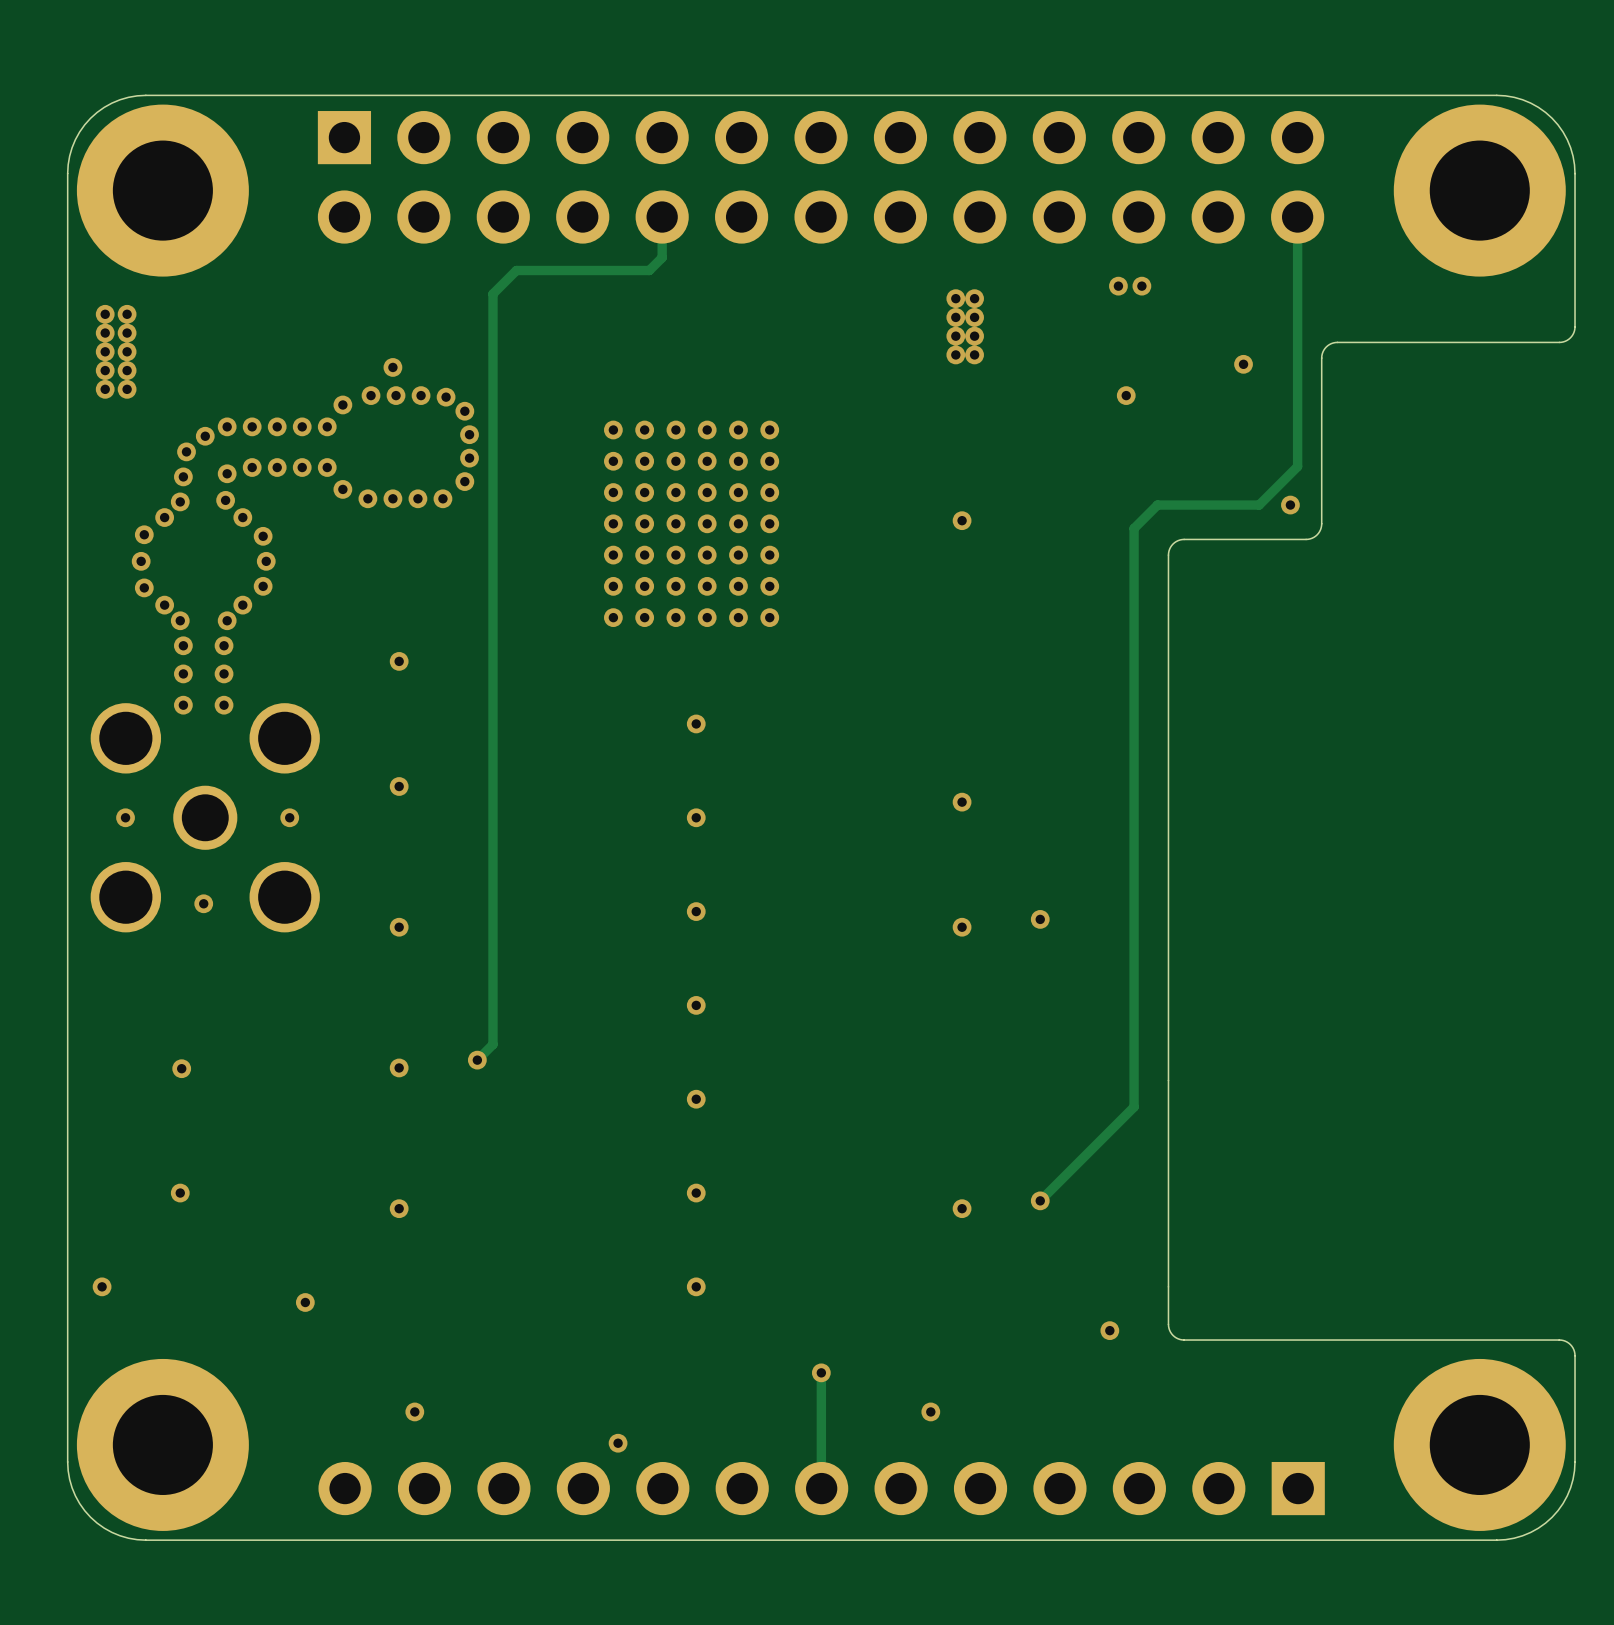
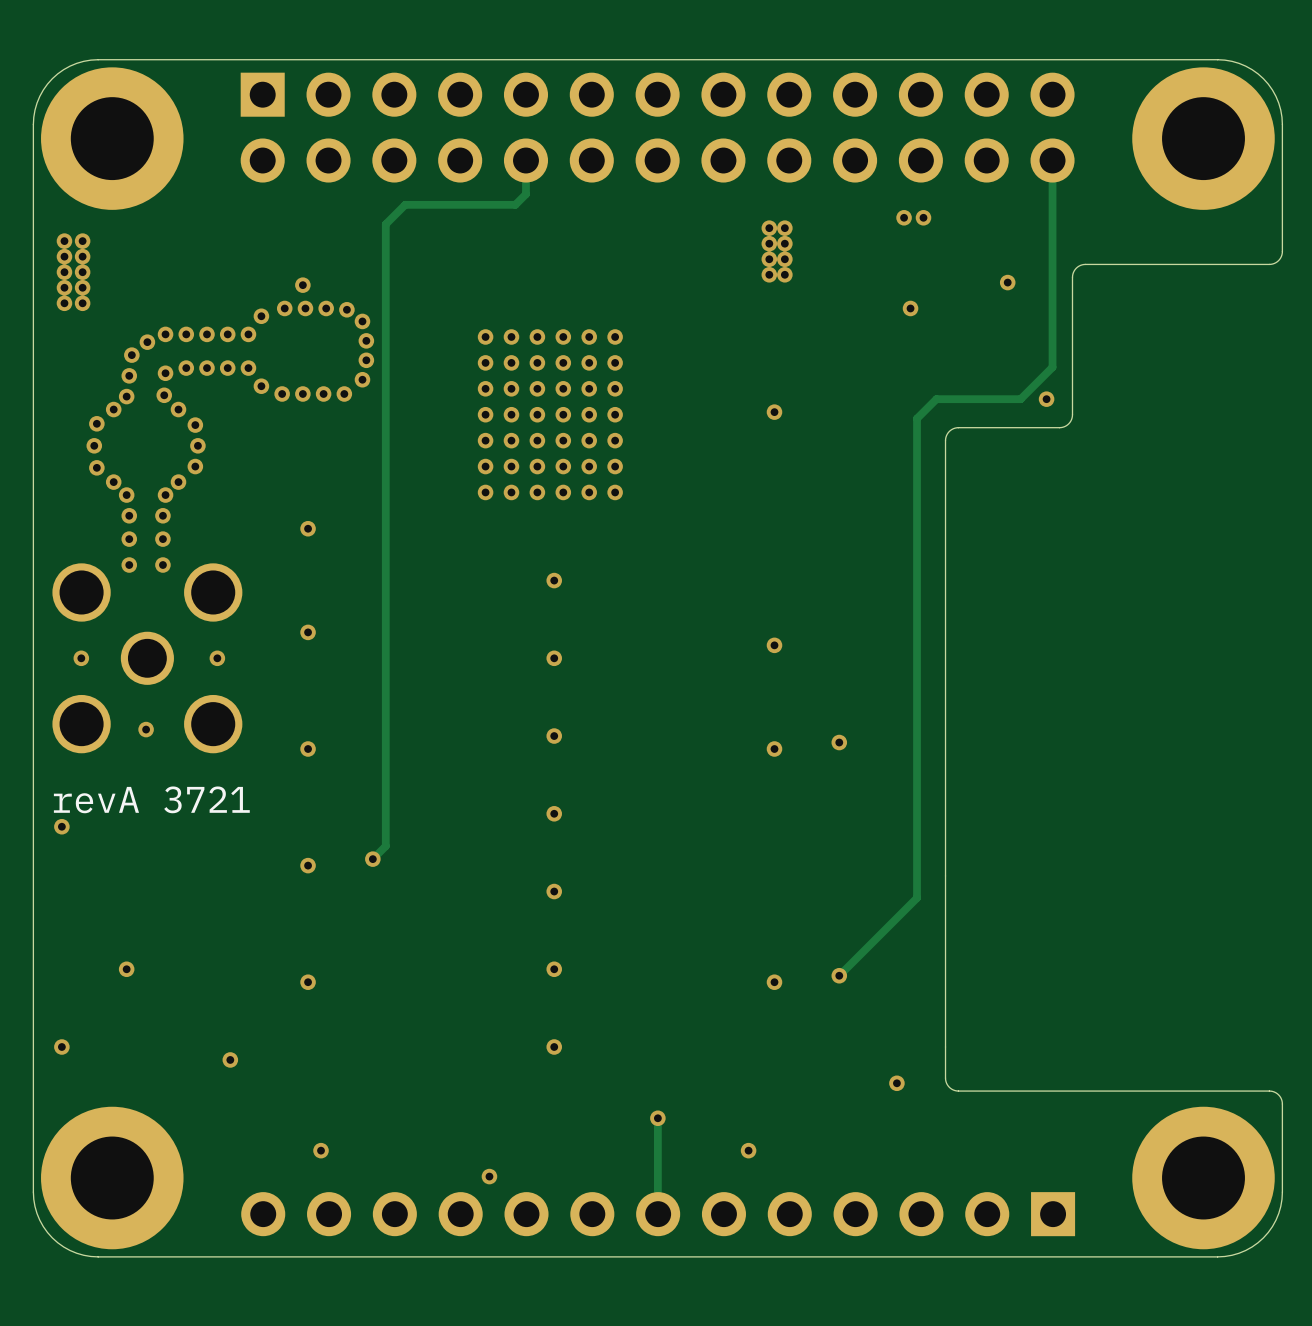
text: none -> revA 3721 (151, 799)
via position: (181, 1068) -> (61, 826)

